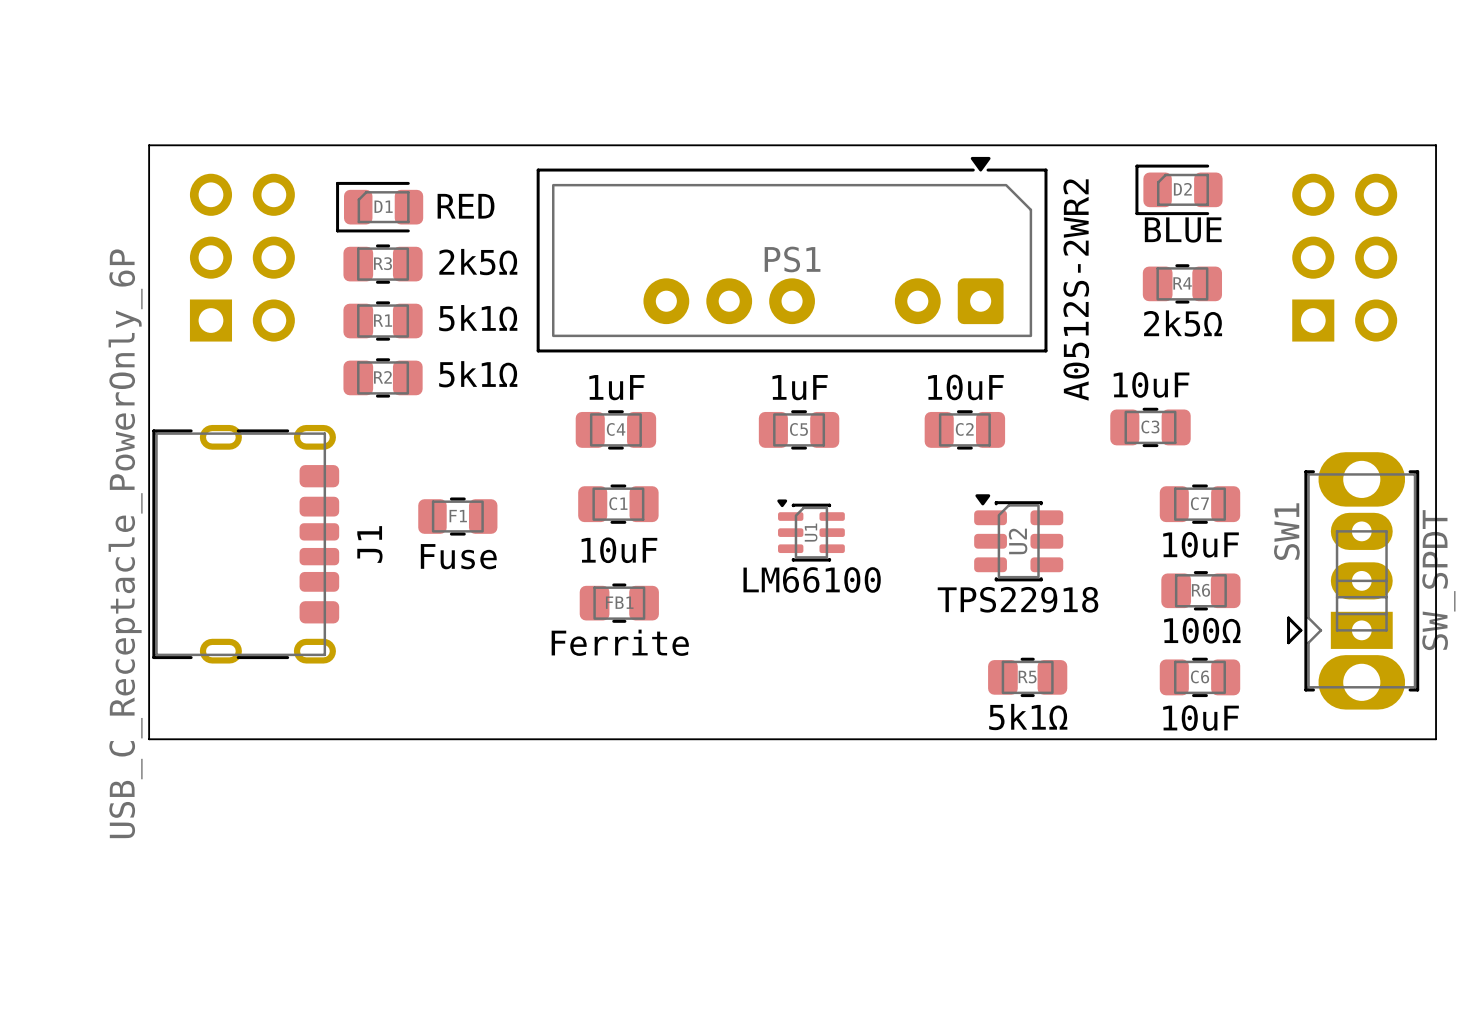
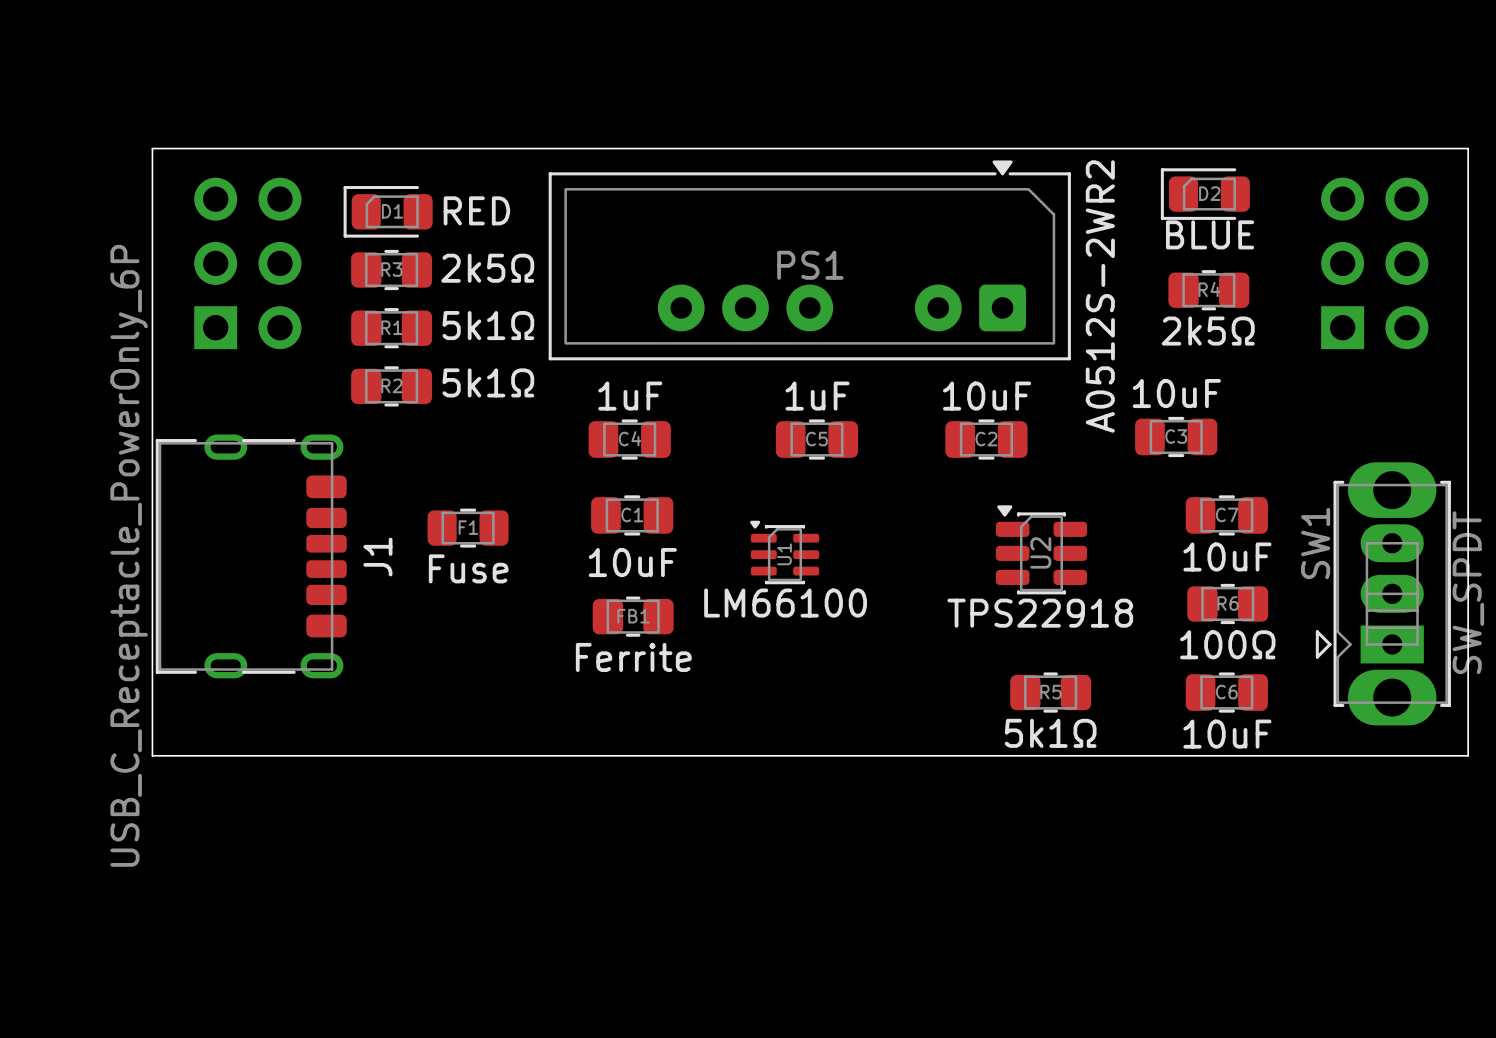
U1 position: (811, 530) -> (784, 552)

